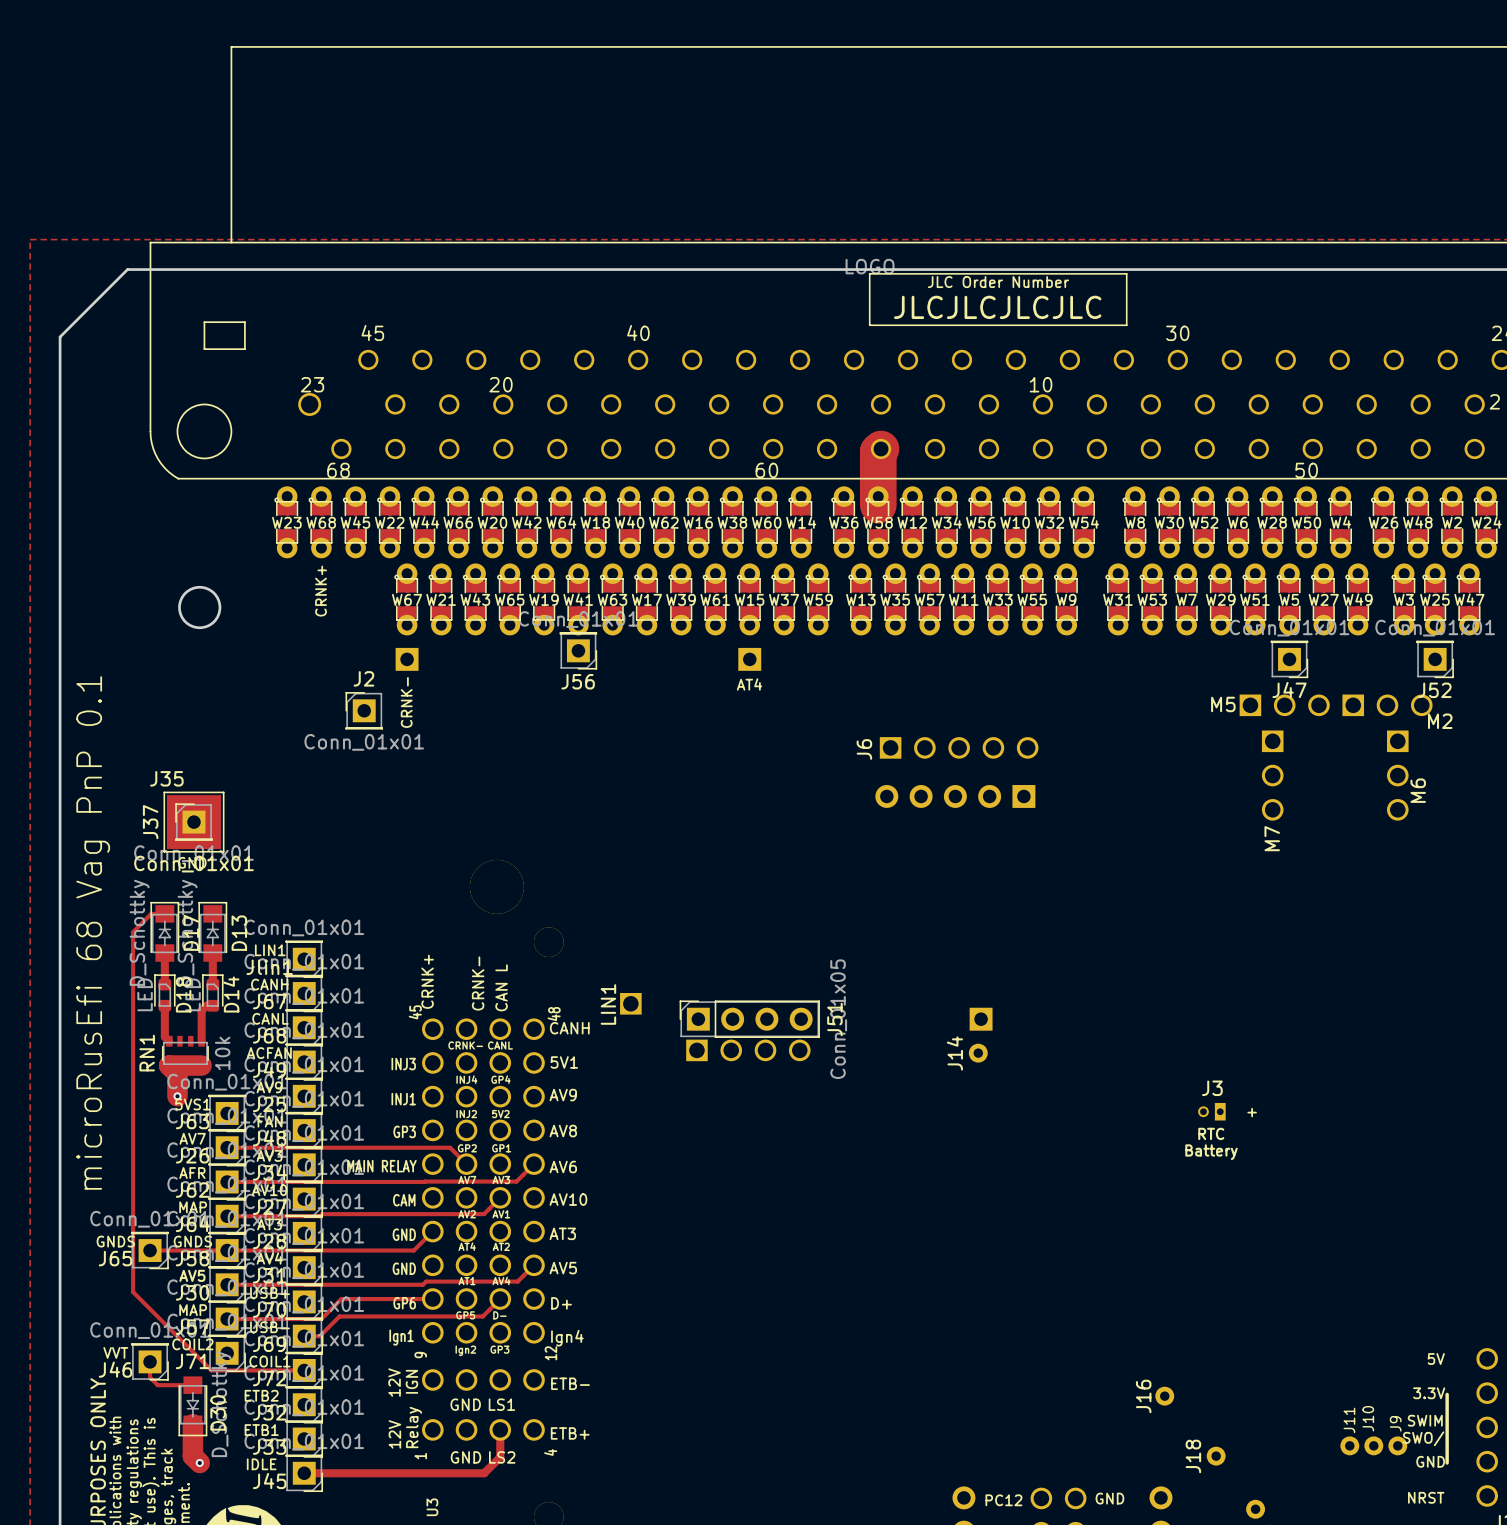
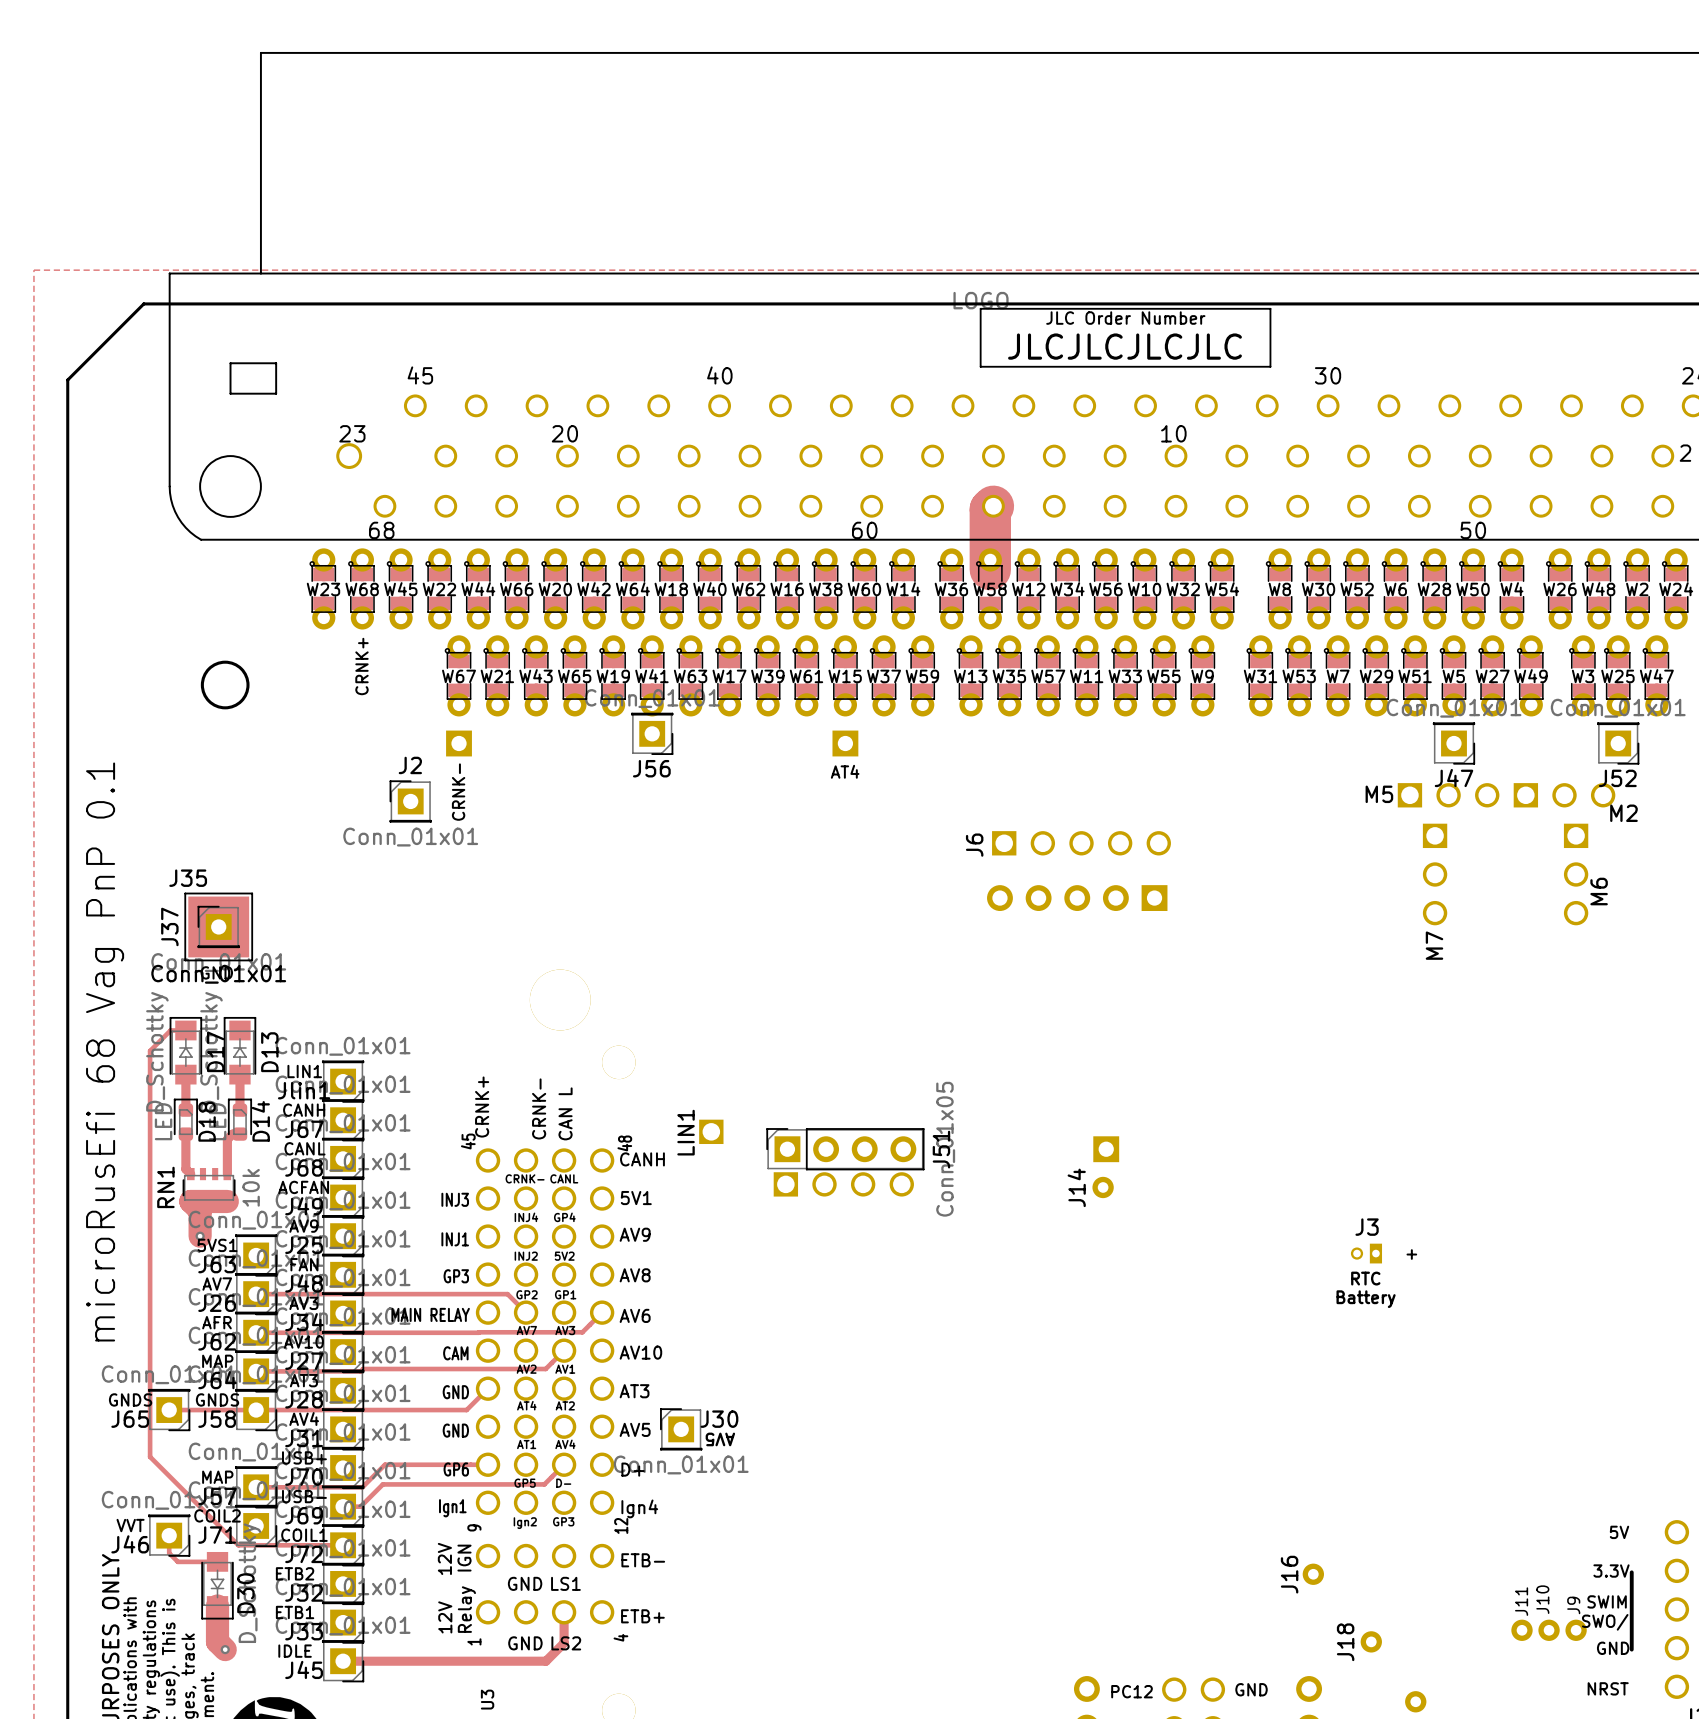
track: (534, 1265) (517, 1281) (426, 1281) (422, 1284) (227, 1284) -> none
text: AV5 (192, 1275) -> none
text: none -> AV5 (720, 1439)
J30 rotation: 0° (227, 1284) -> 180° (681, 1429)
J30 position: (227, 1284) -> (681, 1429)

